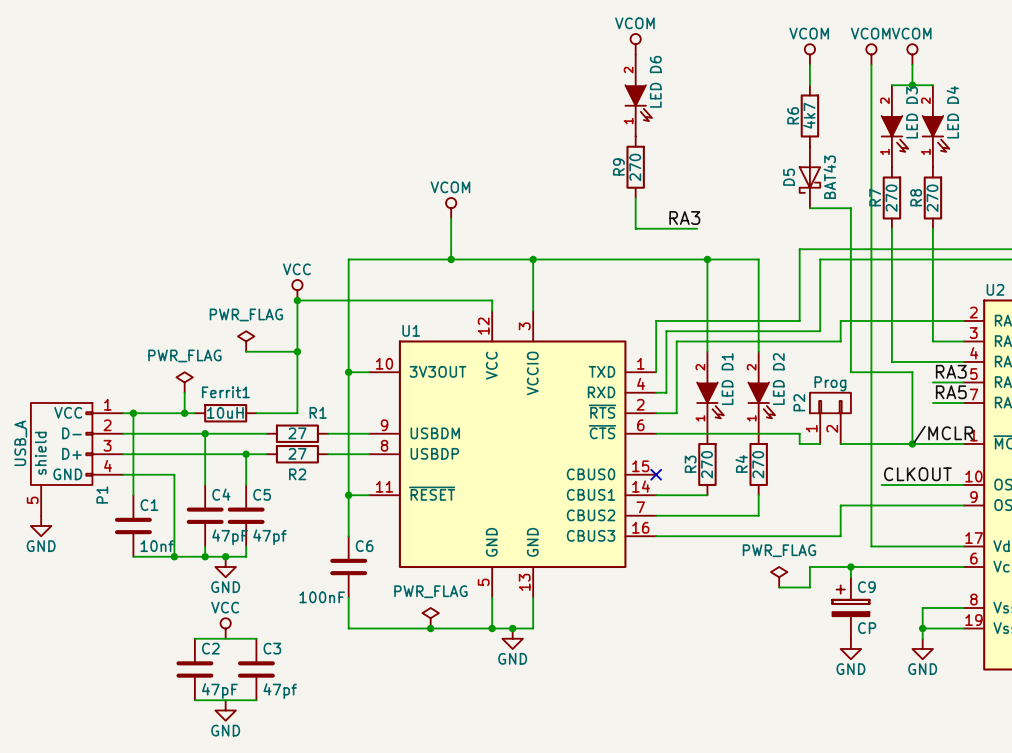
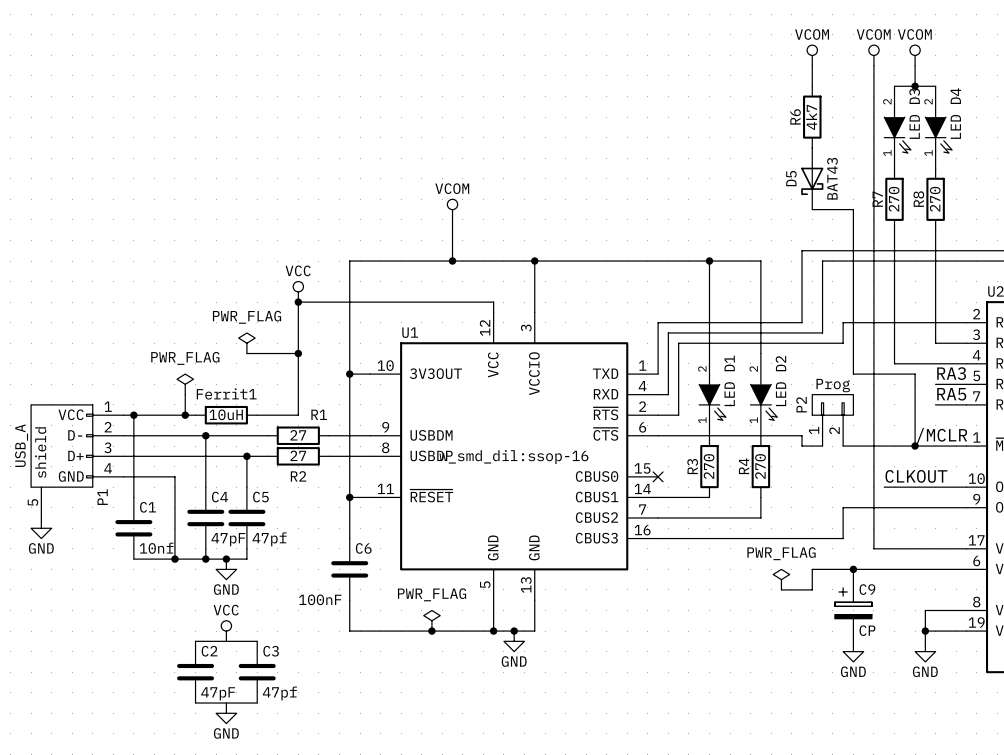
power symbol: VCOM (635, 44) -> none
D6: LED (638, 95) -> none
R9: 270 (635, 167) -> none
wire: (635, 197) (635, 228) (697, 228) -> none
label: RA3 (684, 218) -> none
U1 text: none -> w_smd_dil:ssop-16 (513, 457)

